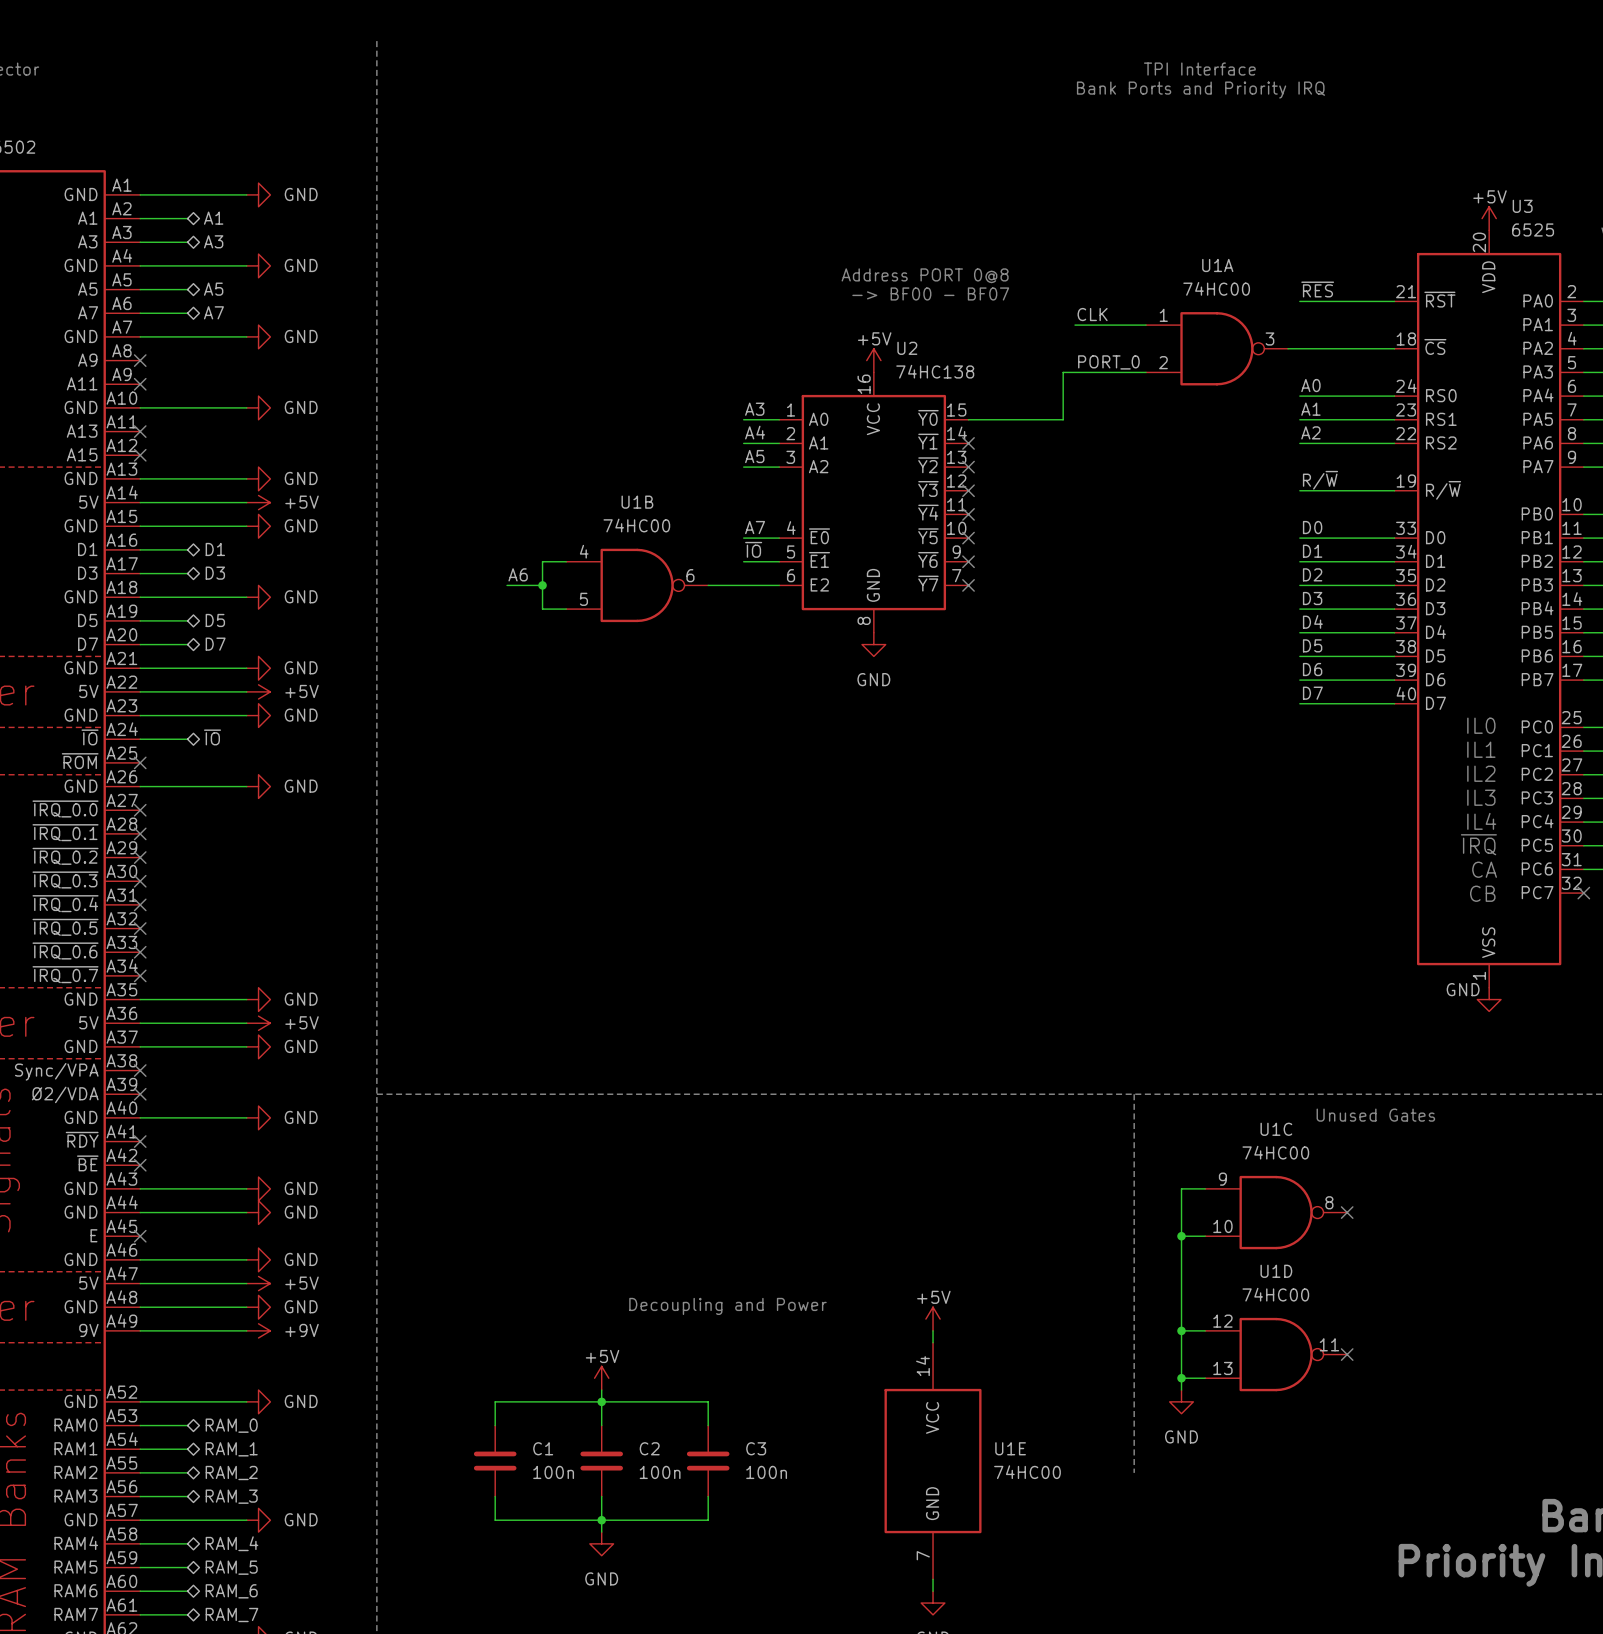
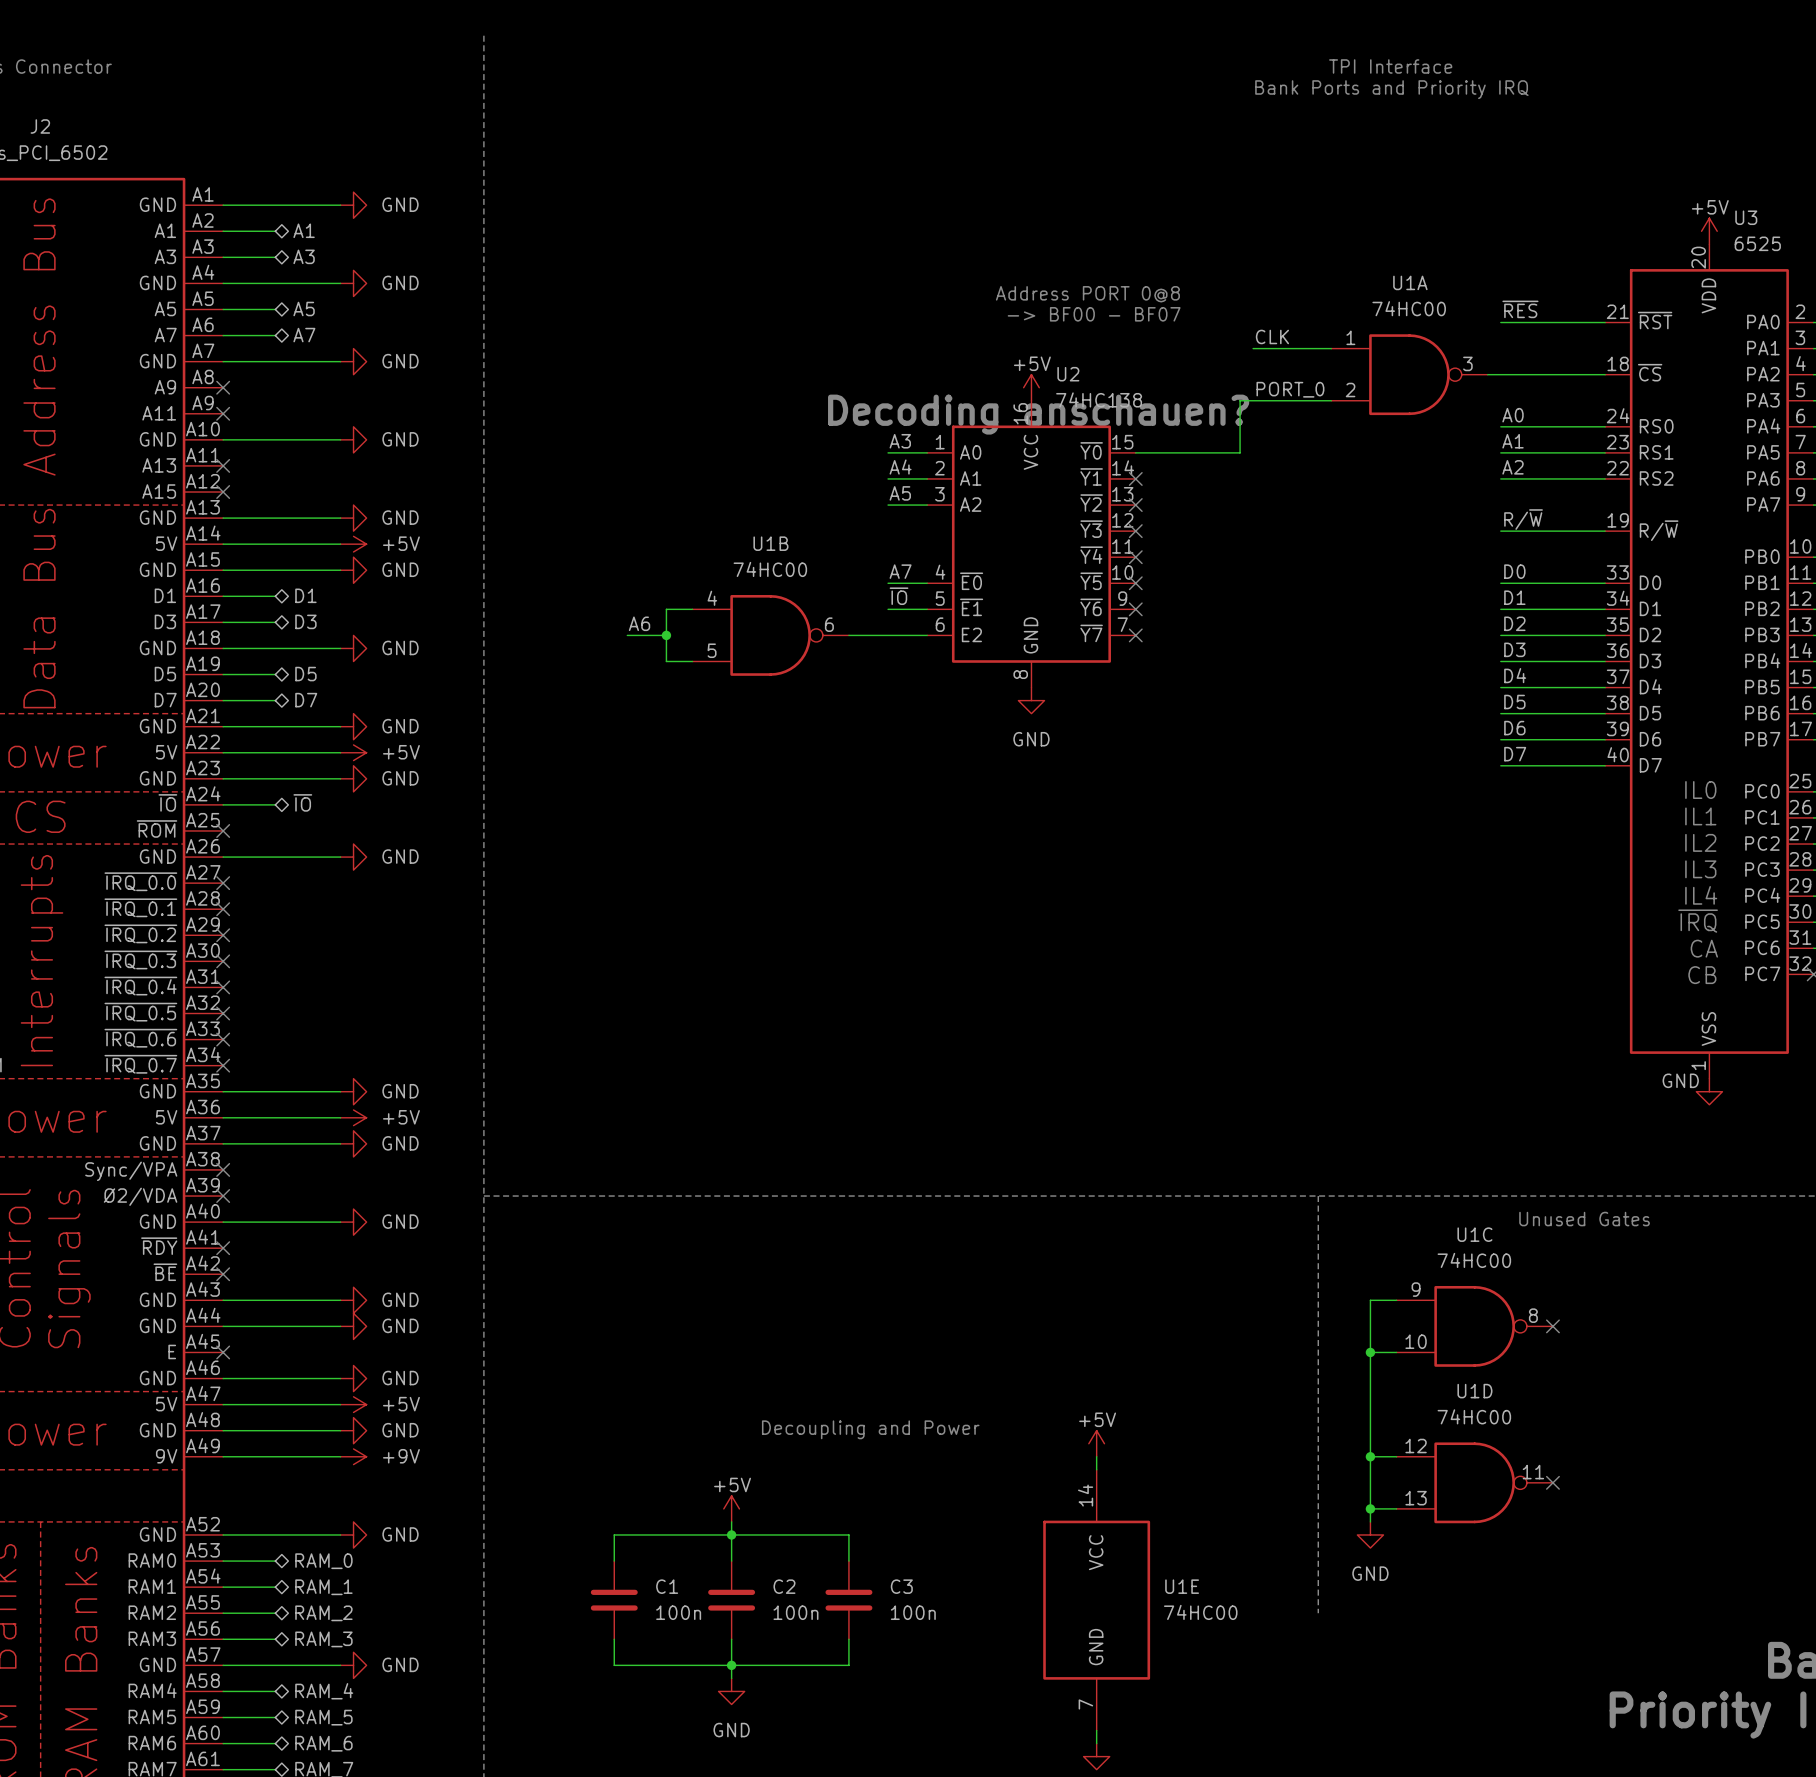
text: none -> Decoding anschauen? (1038, 414)

